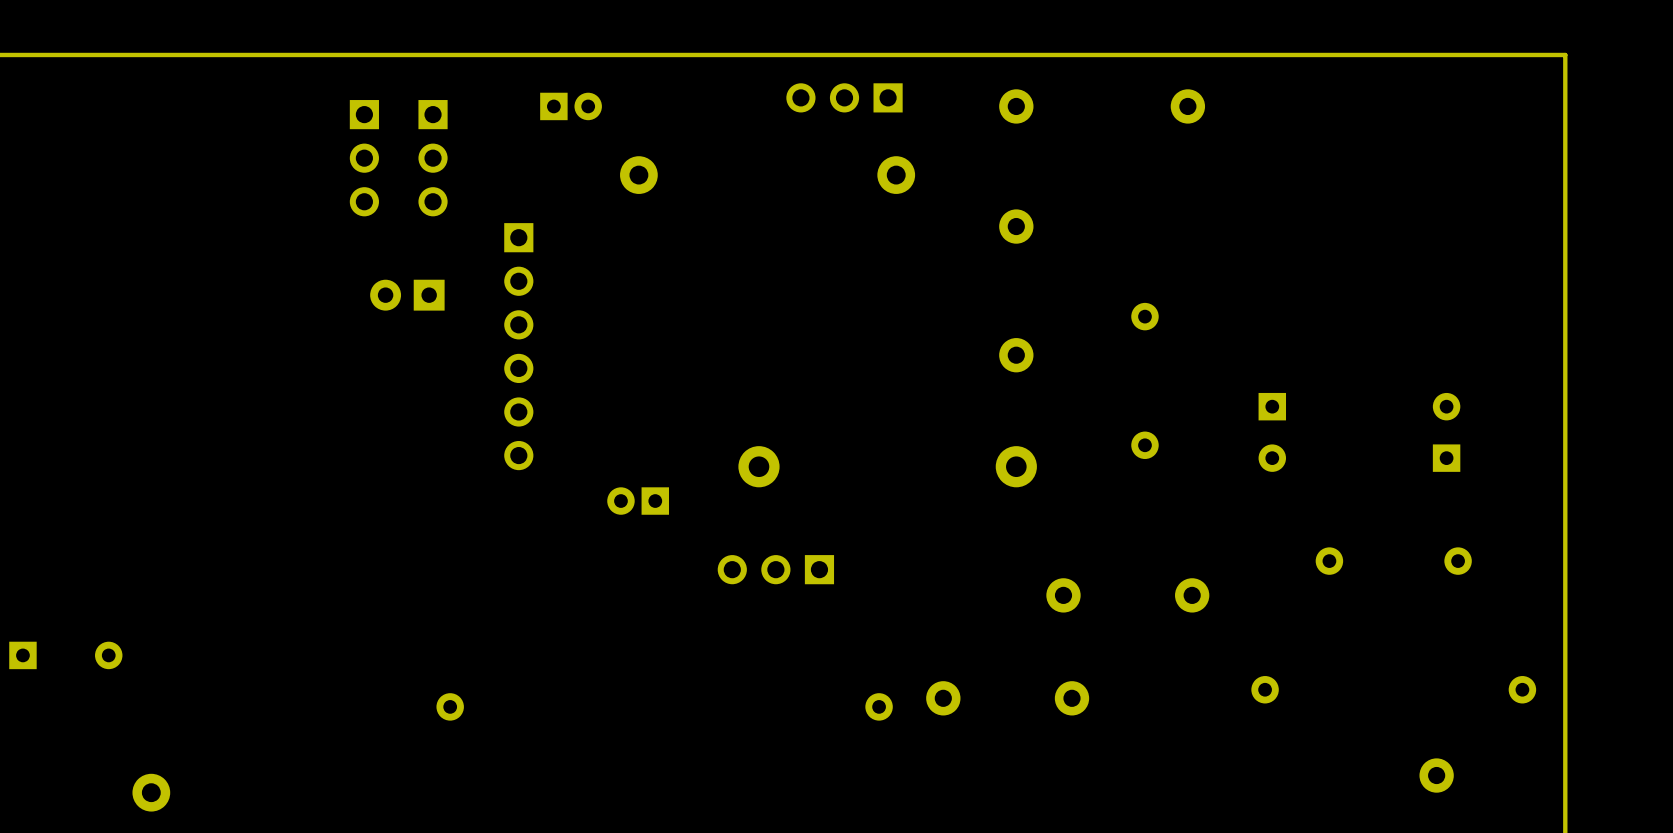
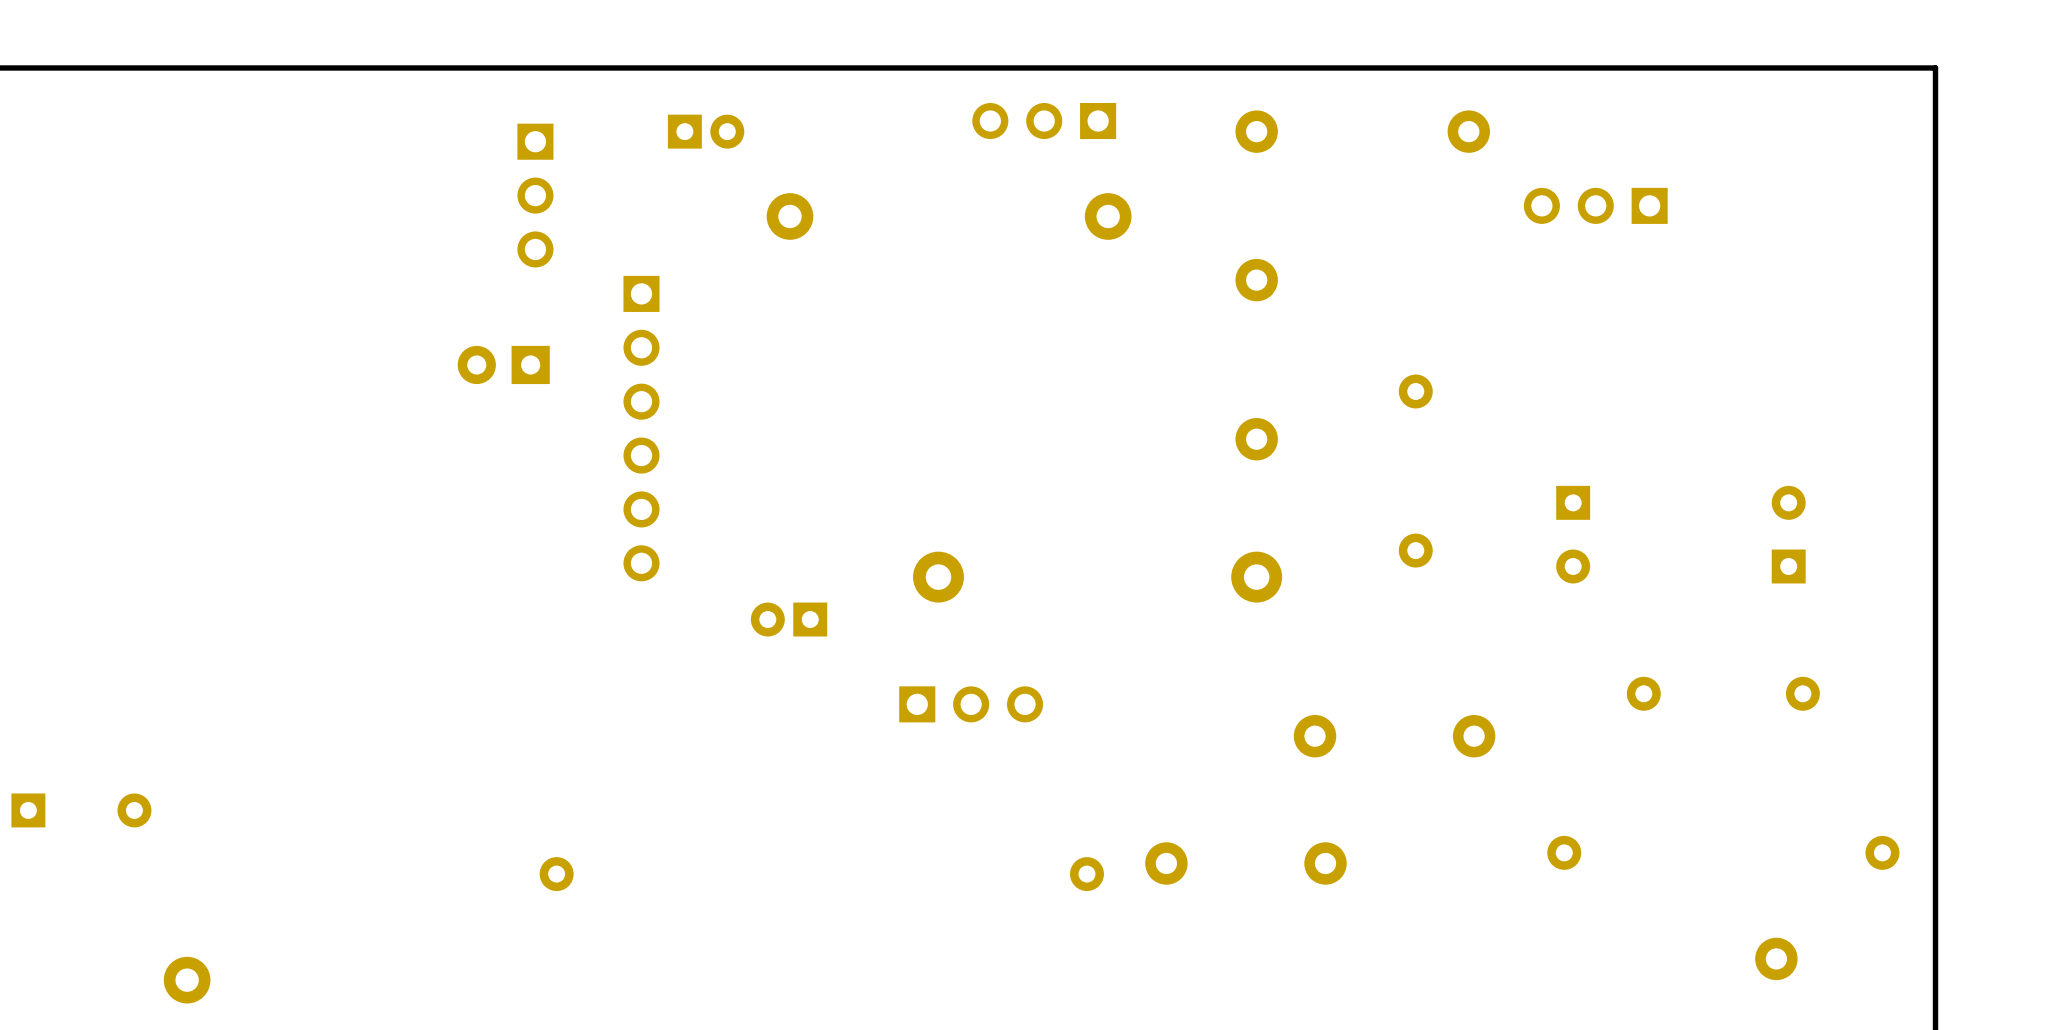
part: (364, 158) -> none
part: none -> (1595, 205)
part rotation: 0° (775, 569) -> 180° (971, 704)

